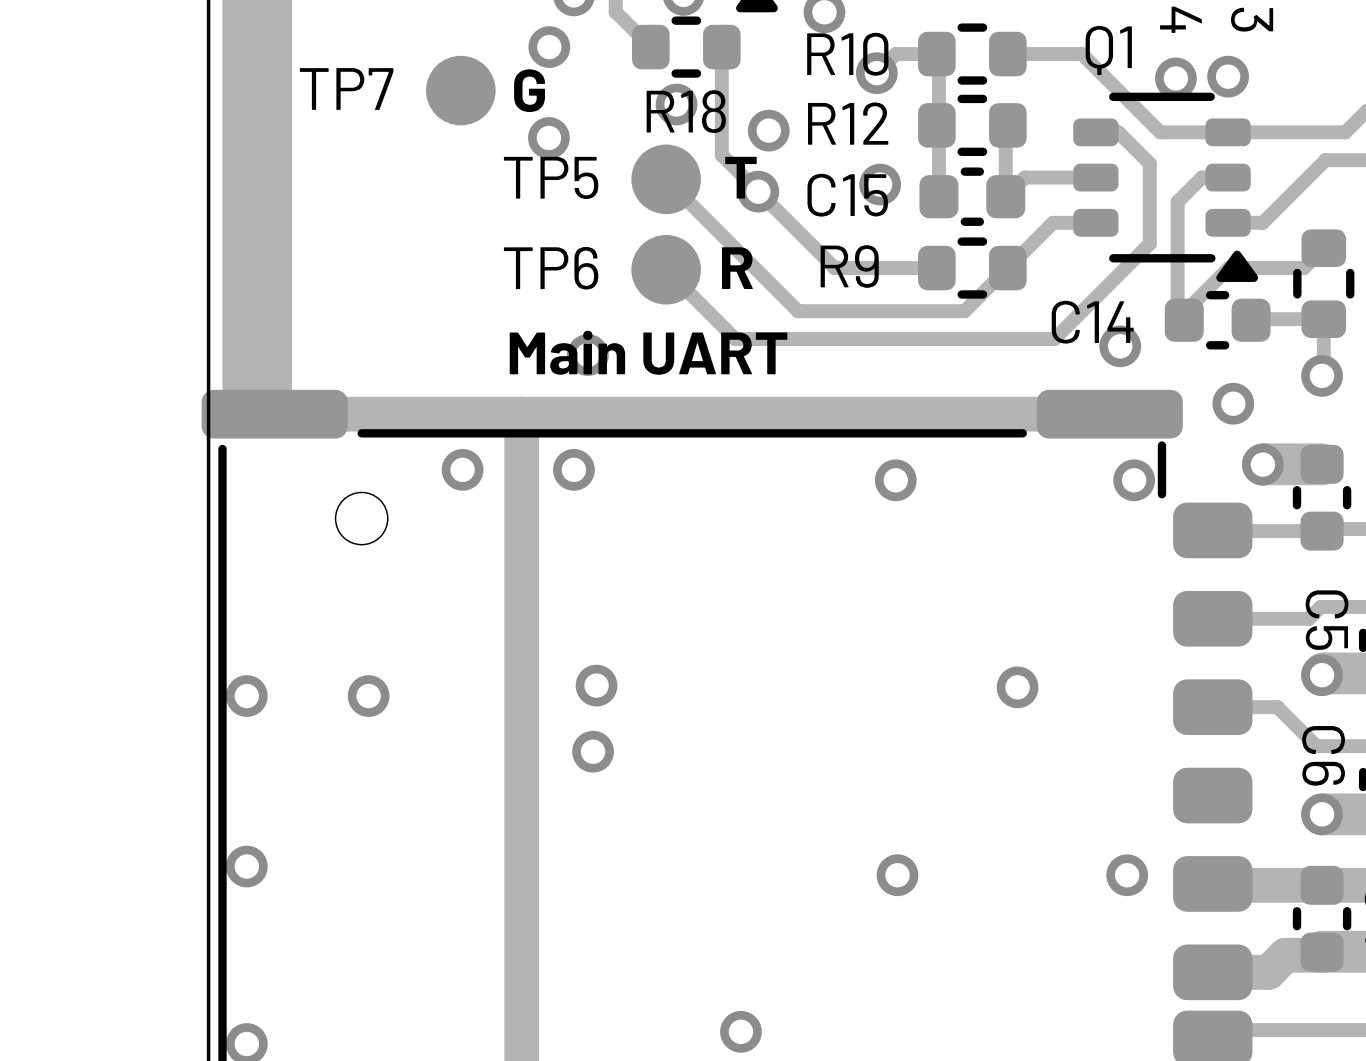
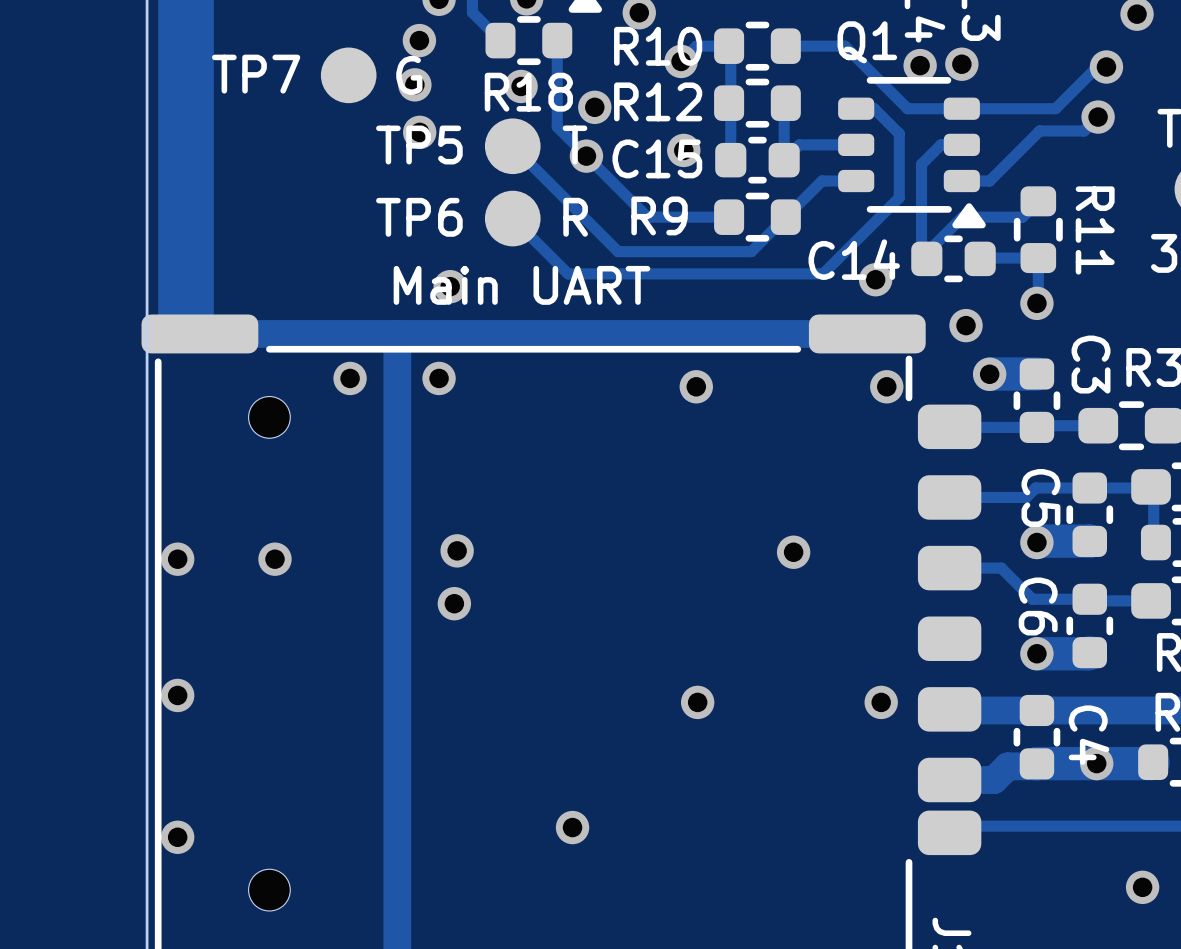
via: none -> (414, 84)
via: (548, 137) -> none
via: none -> (419, 132)

